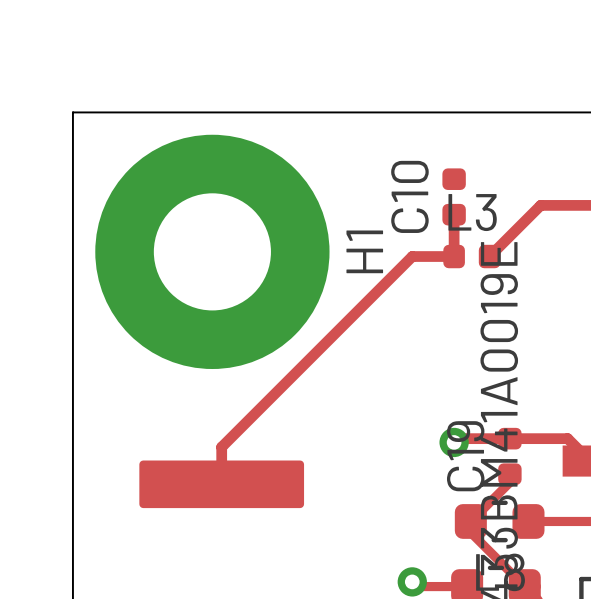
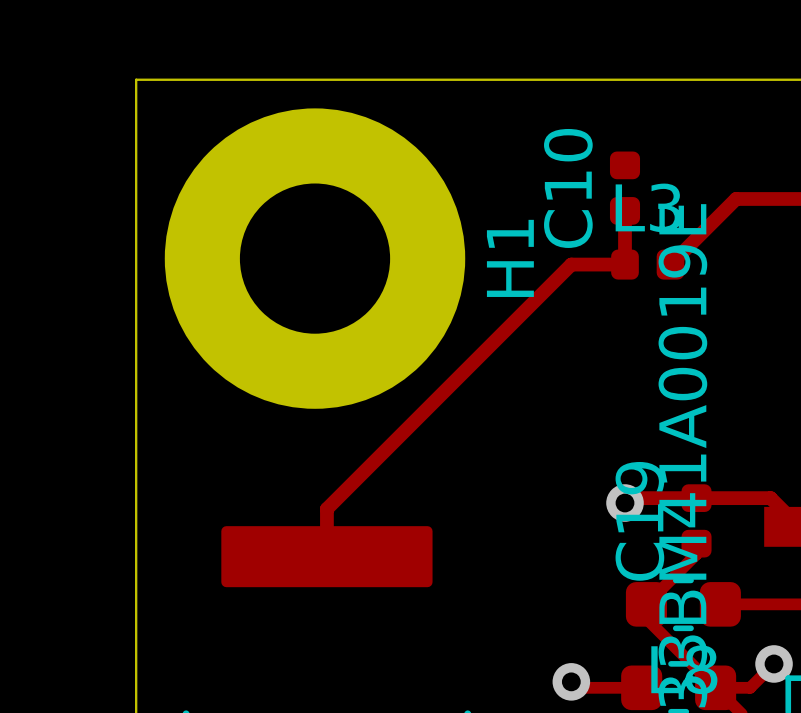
track: none -> (774, 663) (750, 687) (730, 687)
via: none -> (774, 663)

